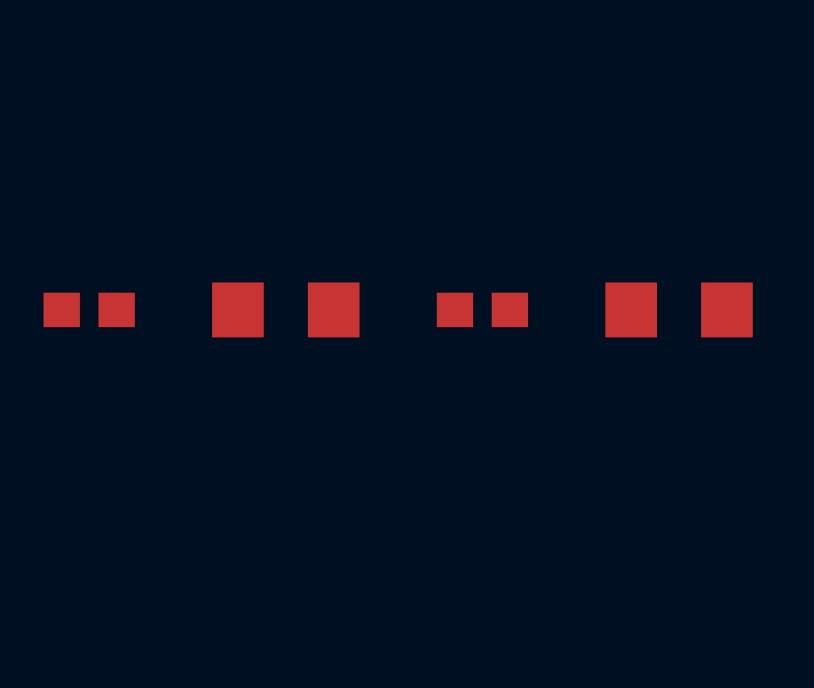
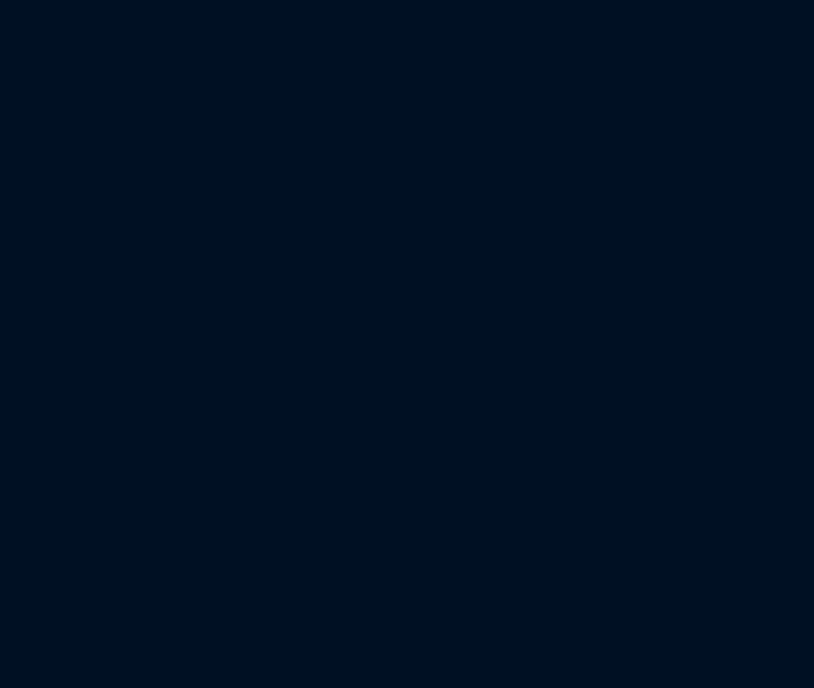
part: (89, 309) -> none
part: (285, 309) -> none
part: (482, 309) -> none
part: (679, 309) -> none

